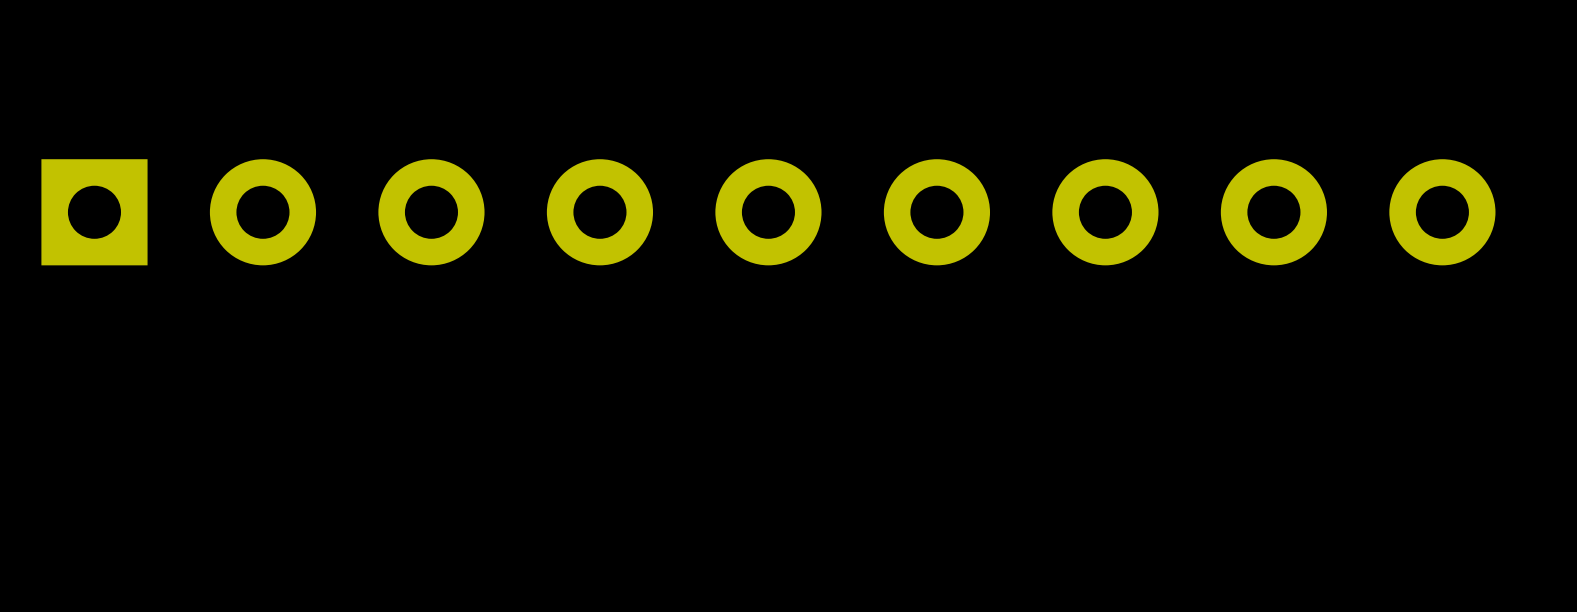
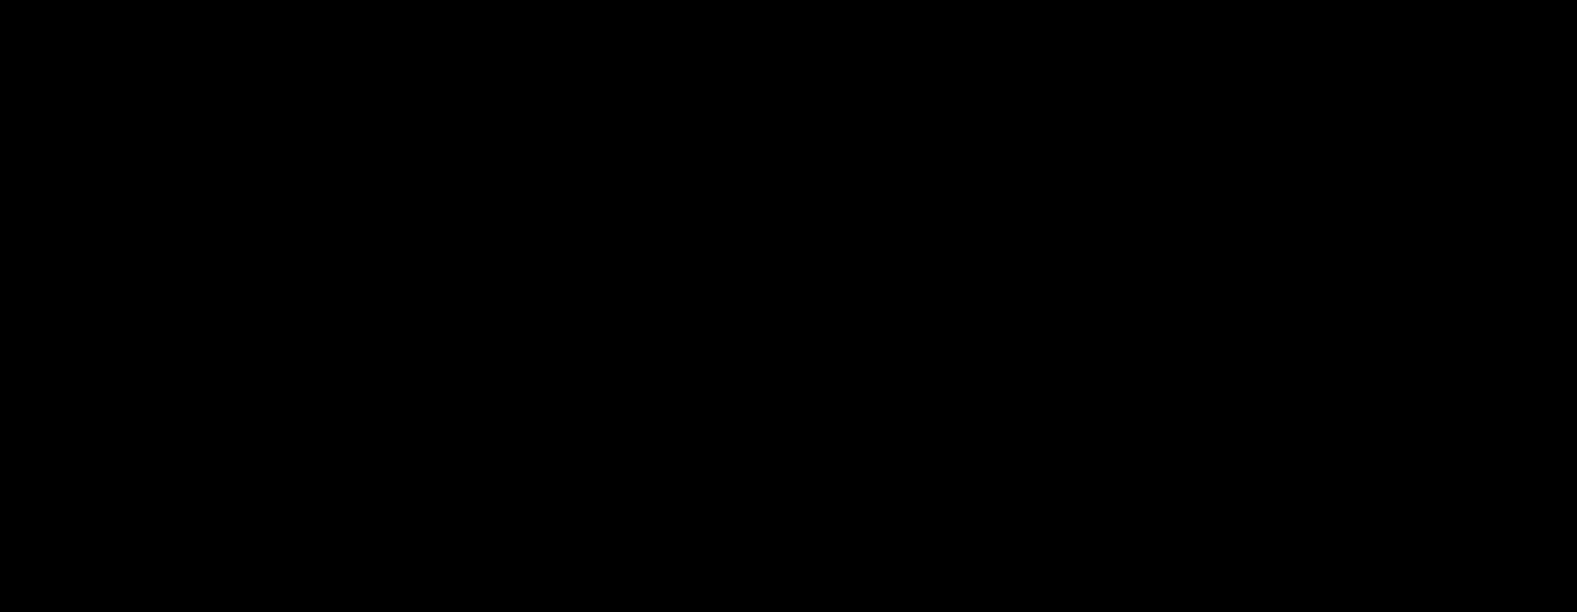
part: (768, 212) -> none

